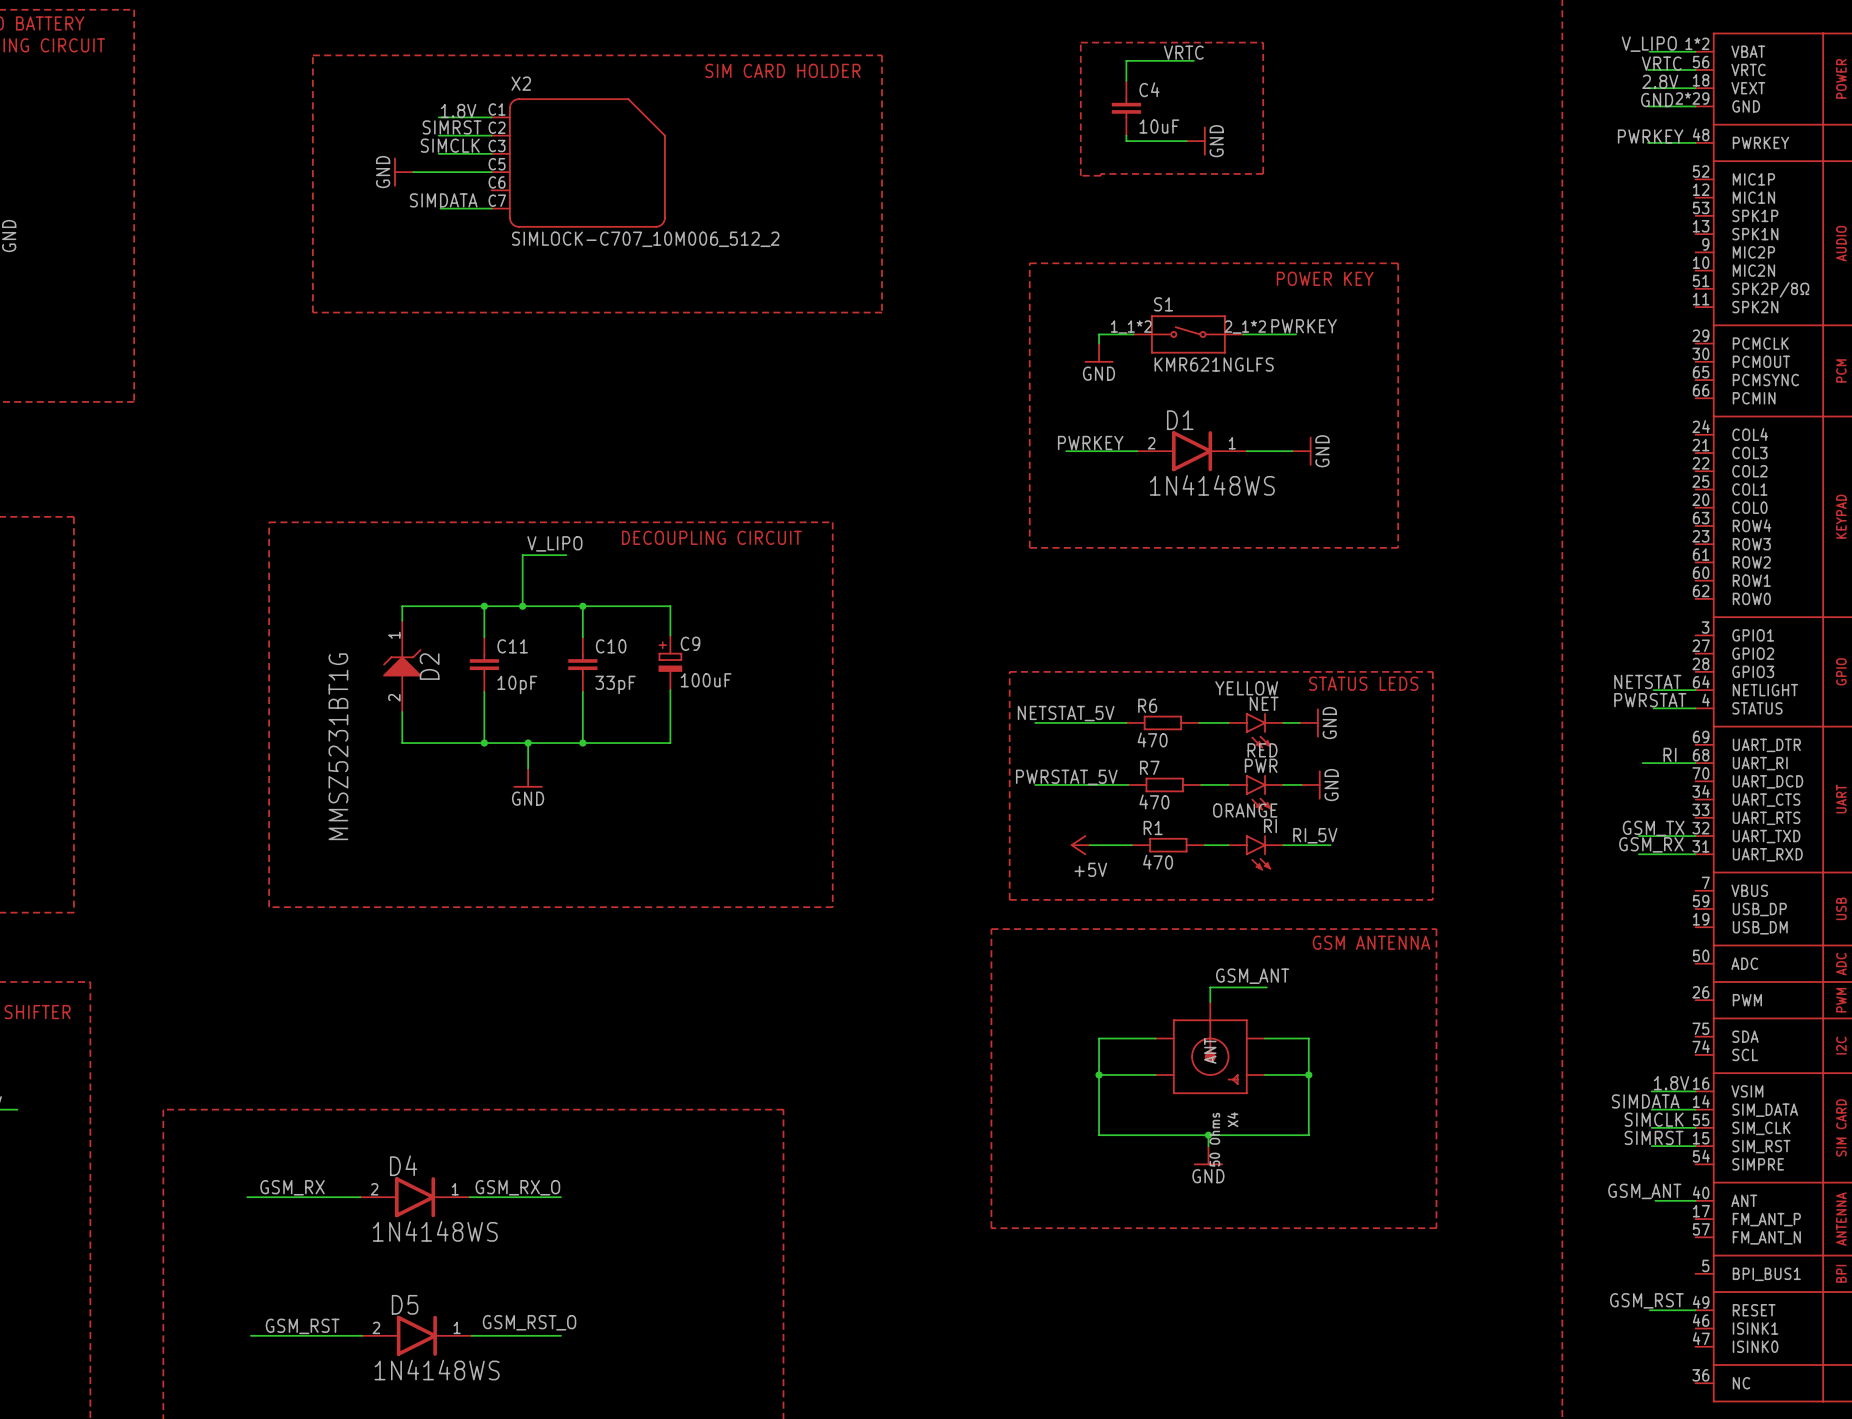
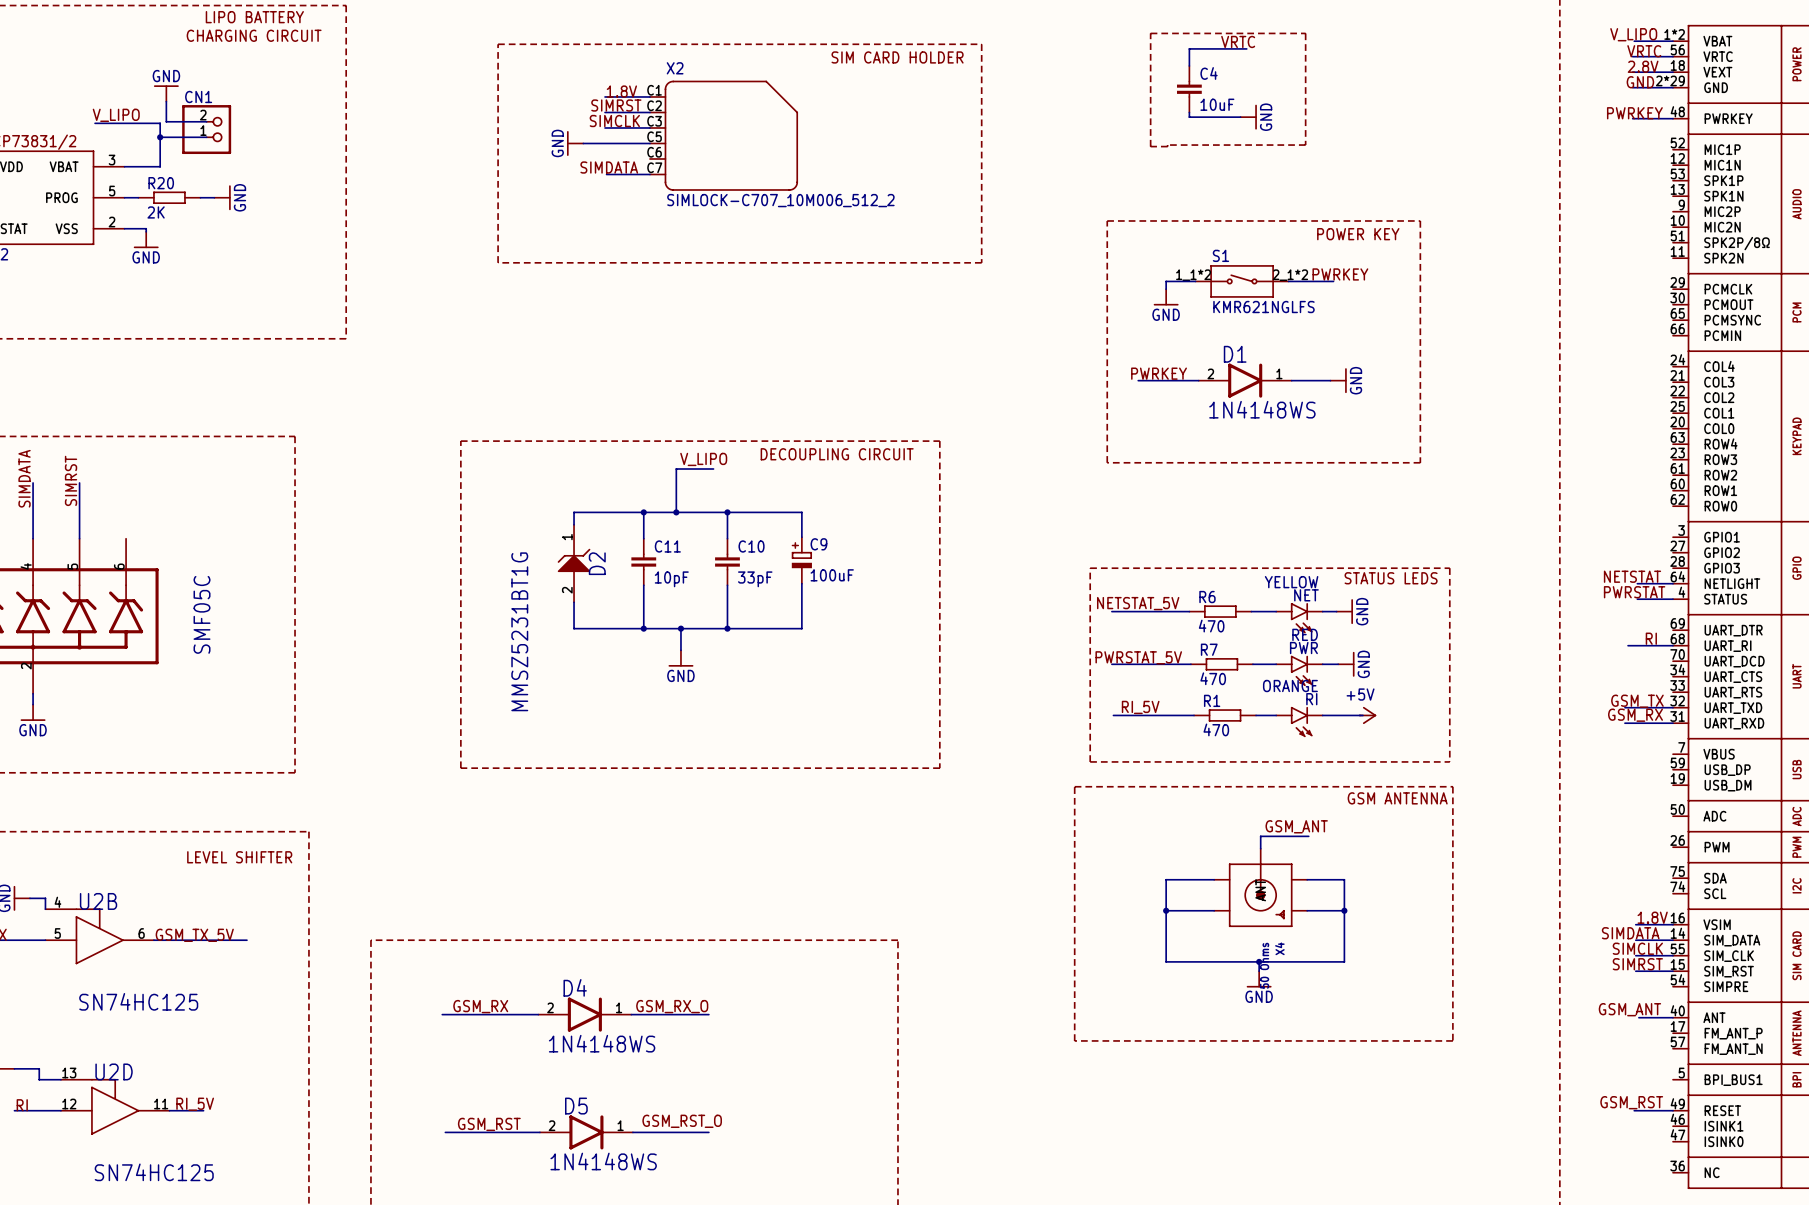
label: none -> RI_5V (1140, 707)
label: RI_5V (1315, 835) -> none
wire: none -> (1113, 715) (1158, 715)
power symbol: +5V (1080, 845) -> none
power symbol: none -> +5V (1368, 715)

